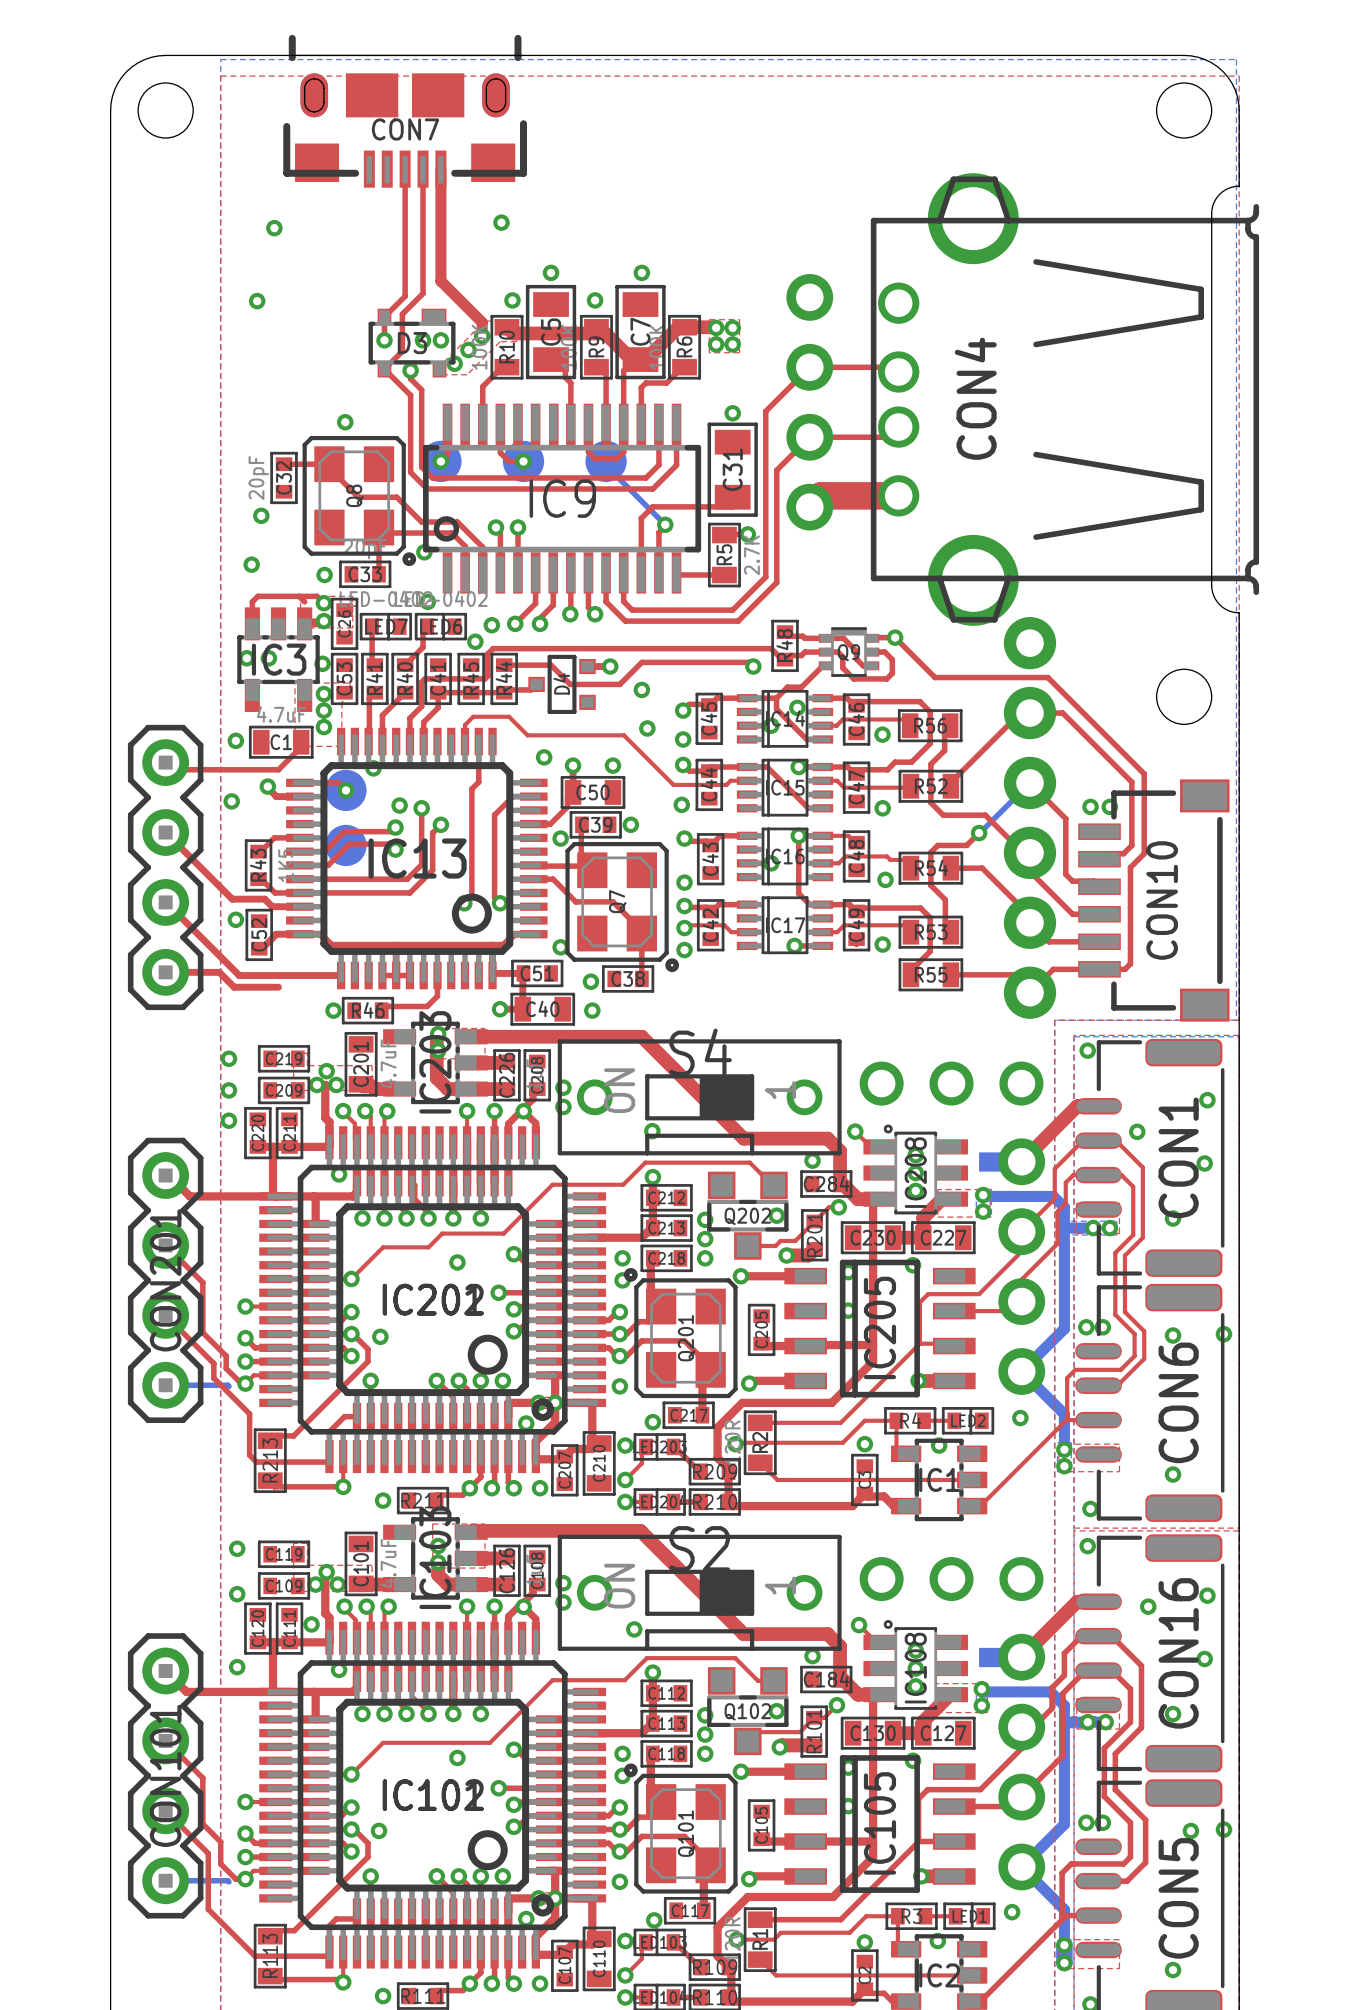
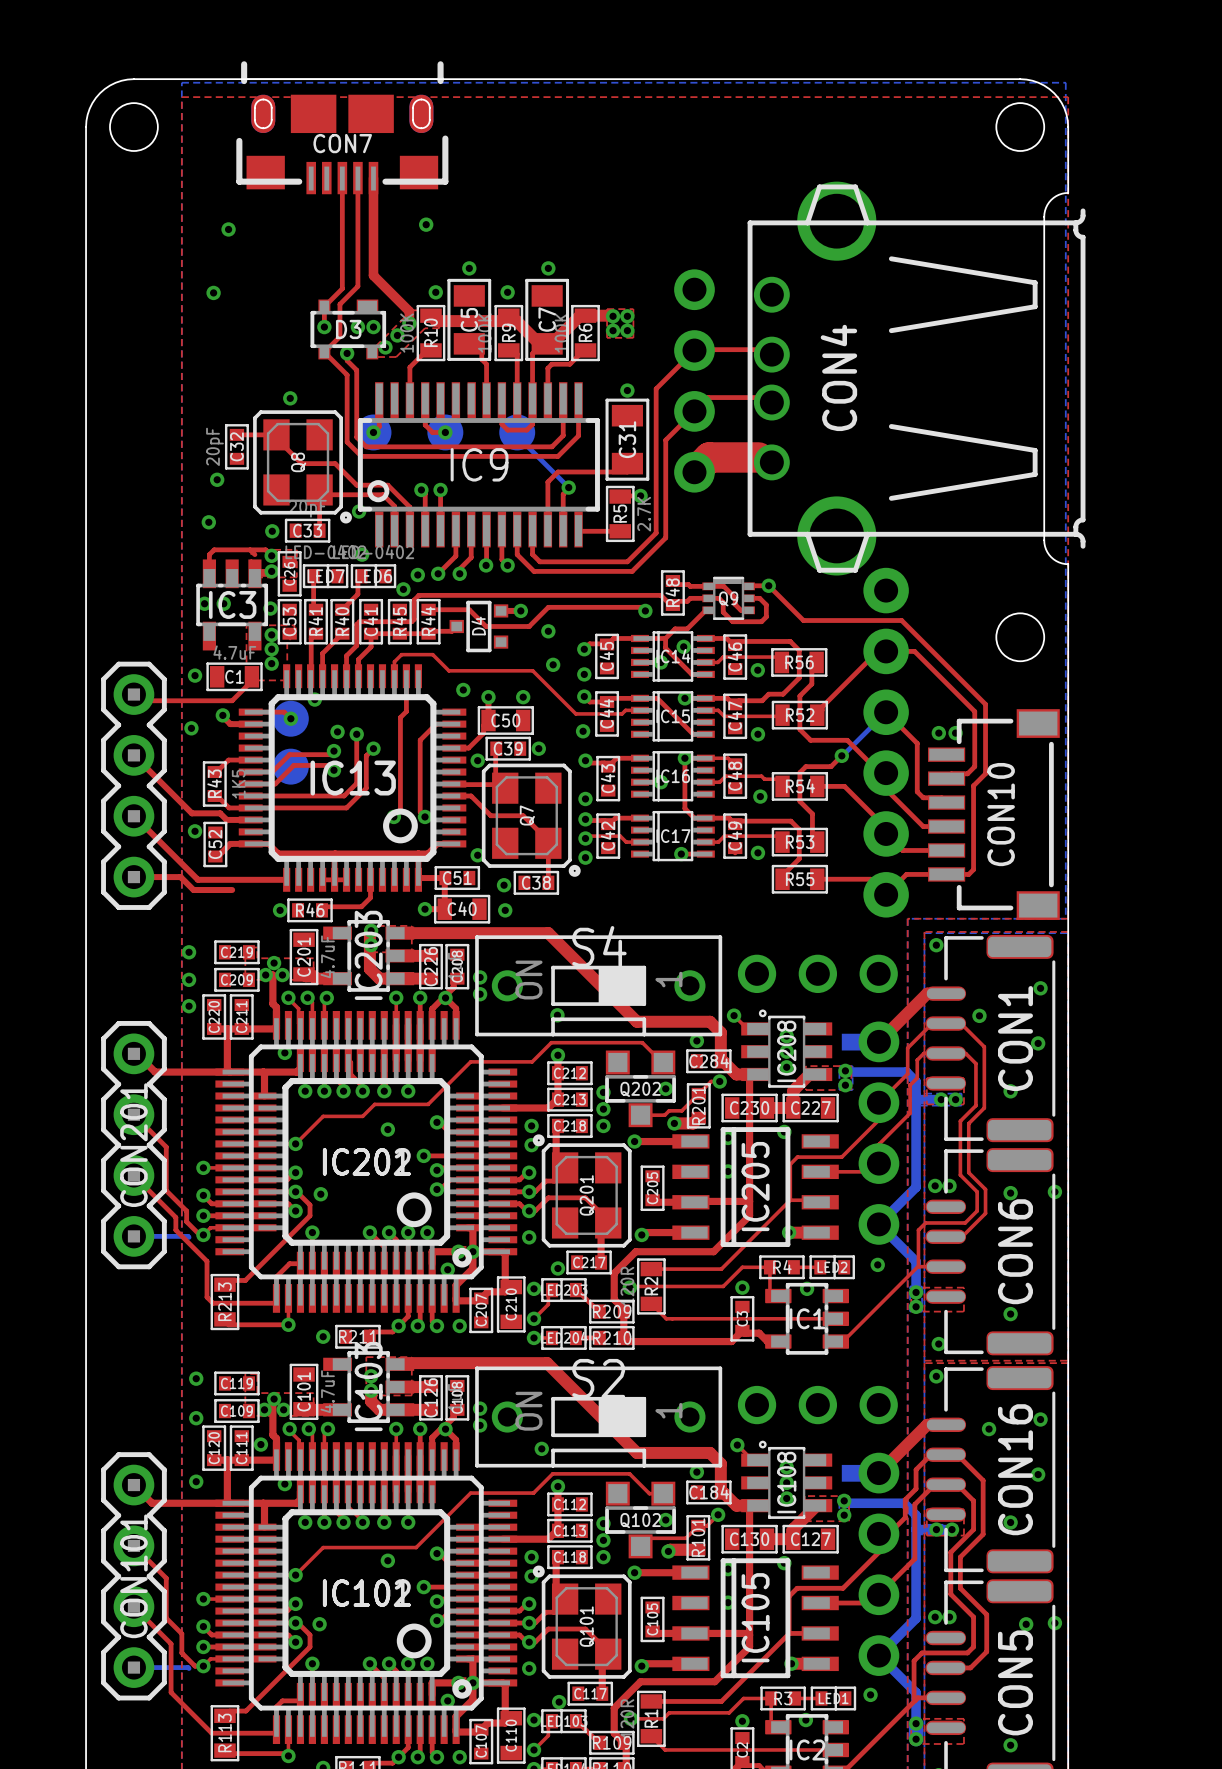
top track: (809, 367) (894, 367) (898, 372) -> (694, 350) (758, 349)
top track: (898, 427) (888, 437) (809, 437) -> (758, 397) (708, 397) (694, 411)
top track: (821, 495) (898, 495) -> (704, 462) (709, 457) (758, 457)

